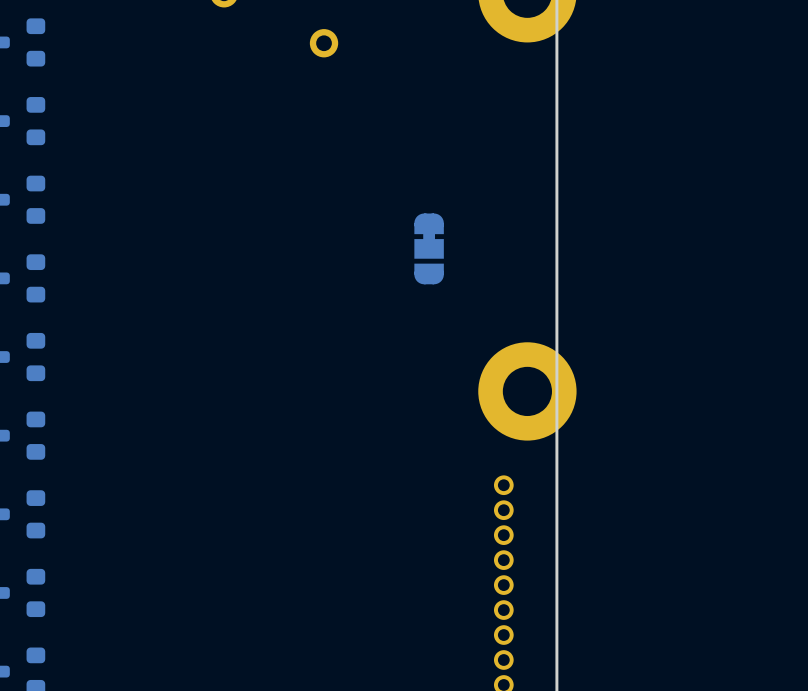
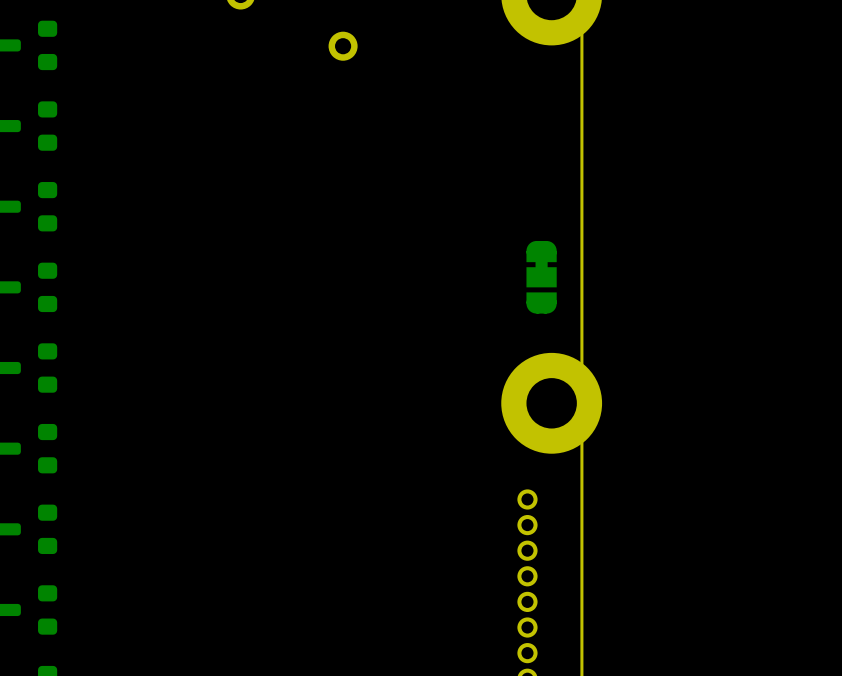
part position: (429, 248) -> (541, 277)

